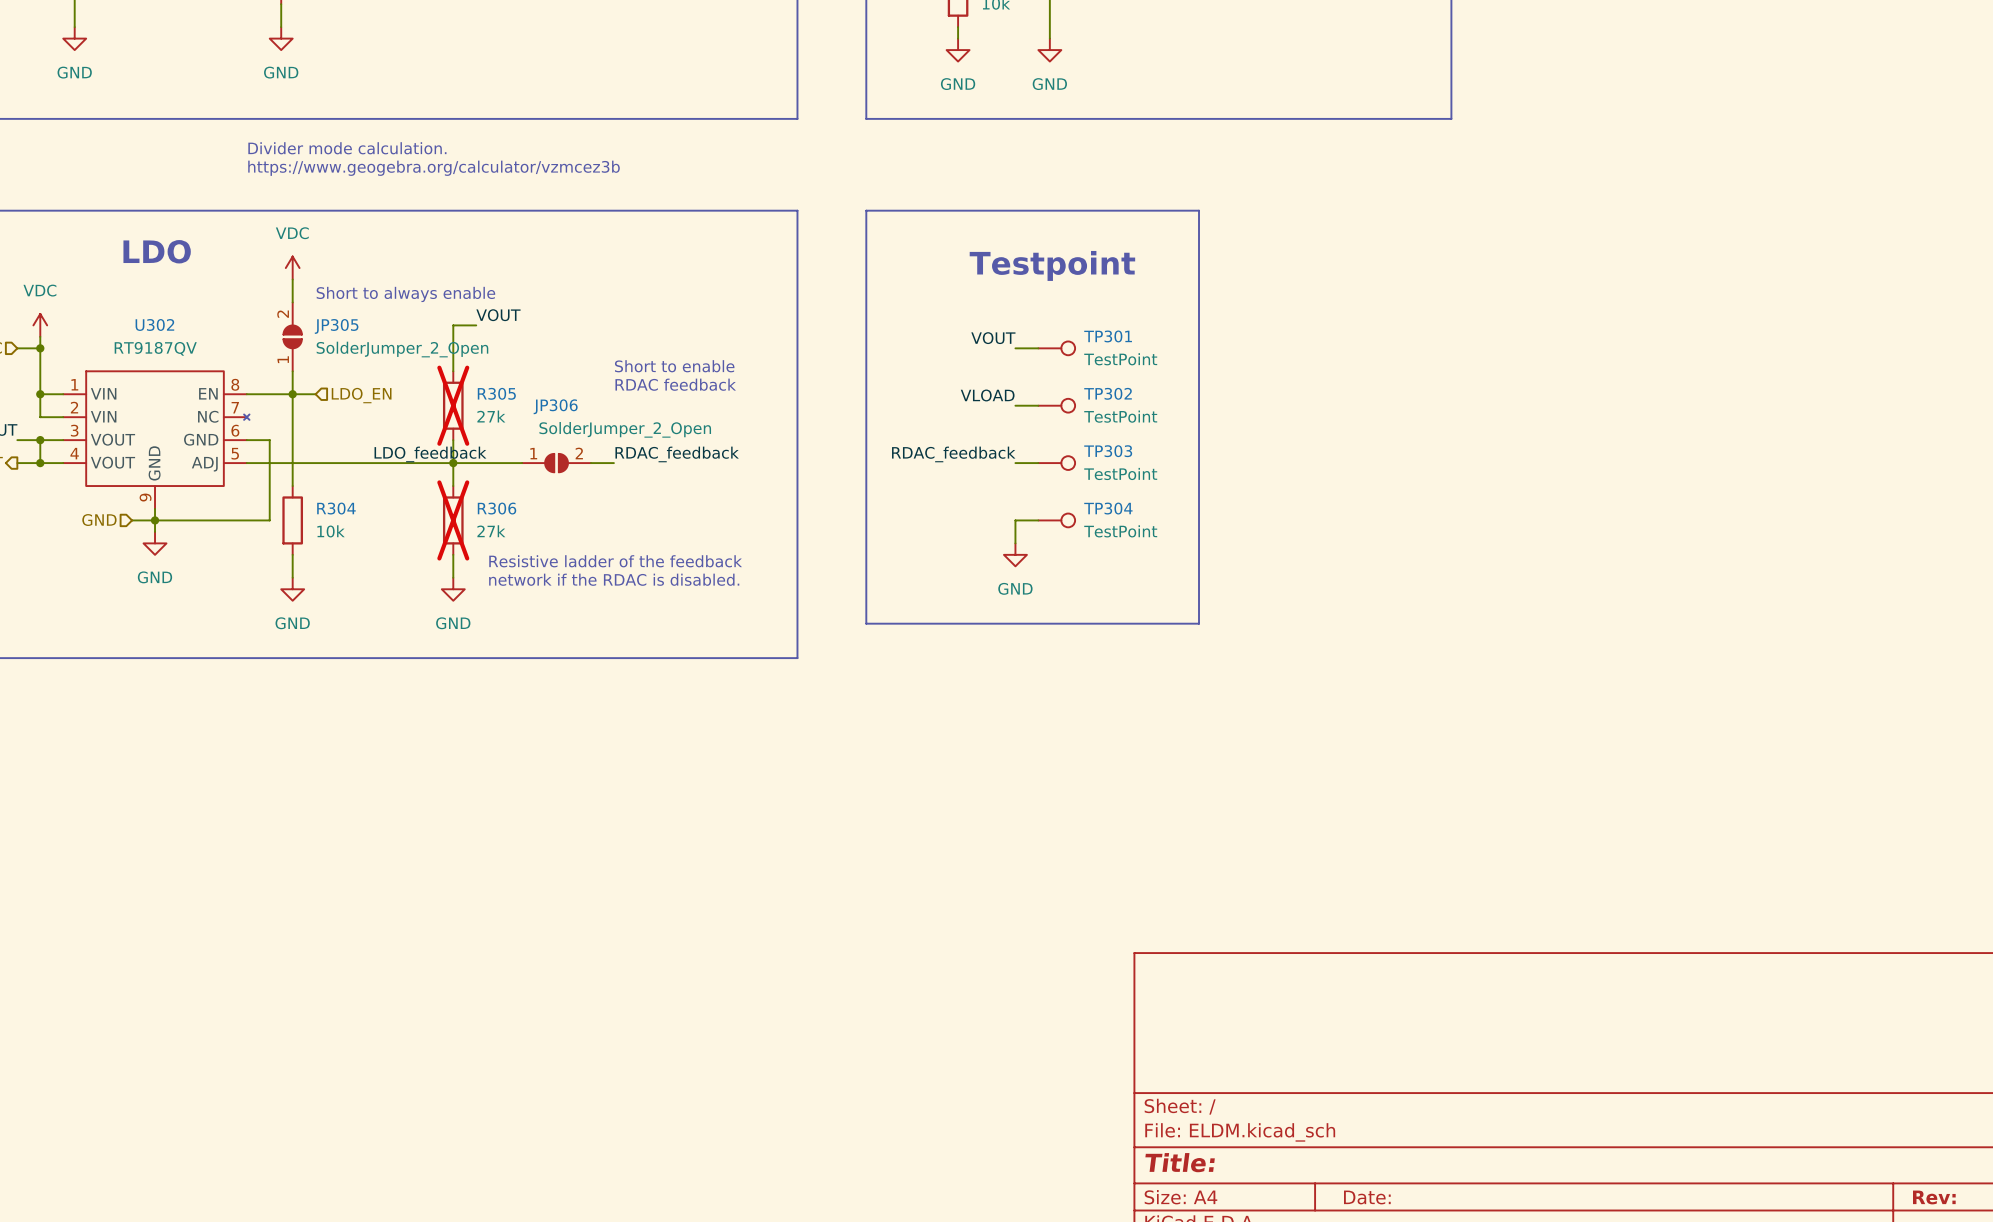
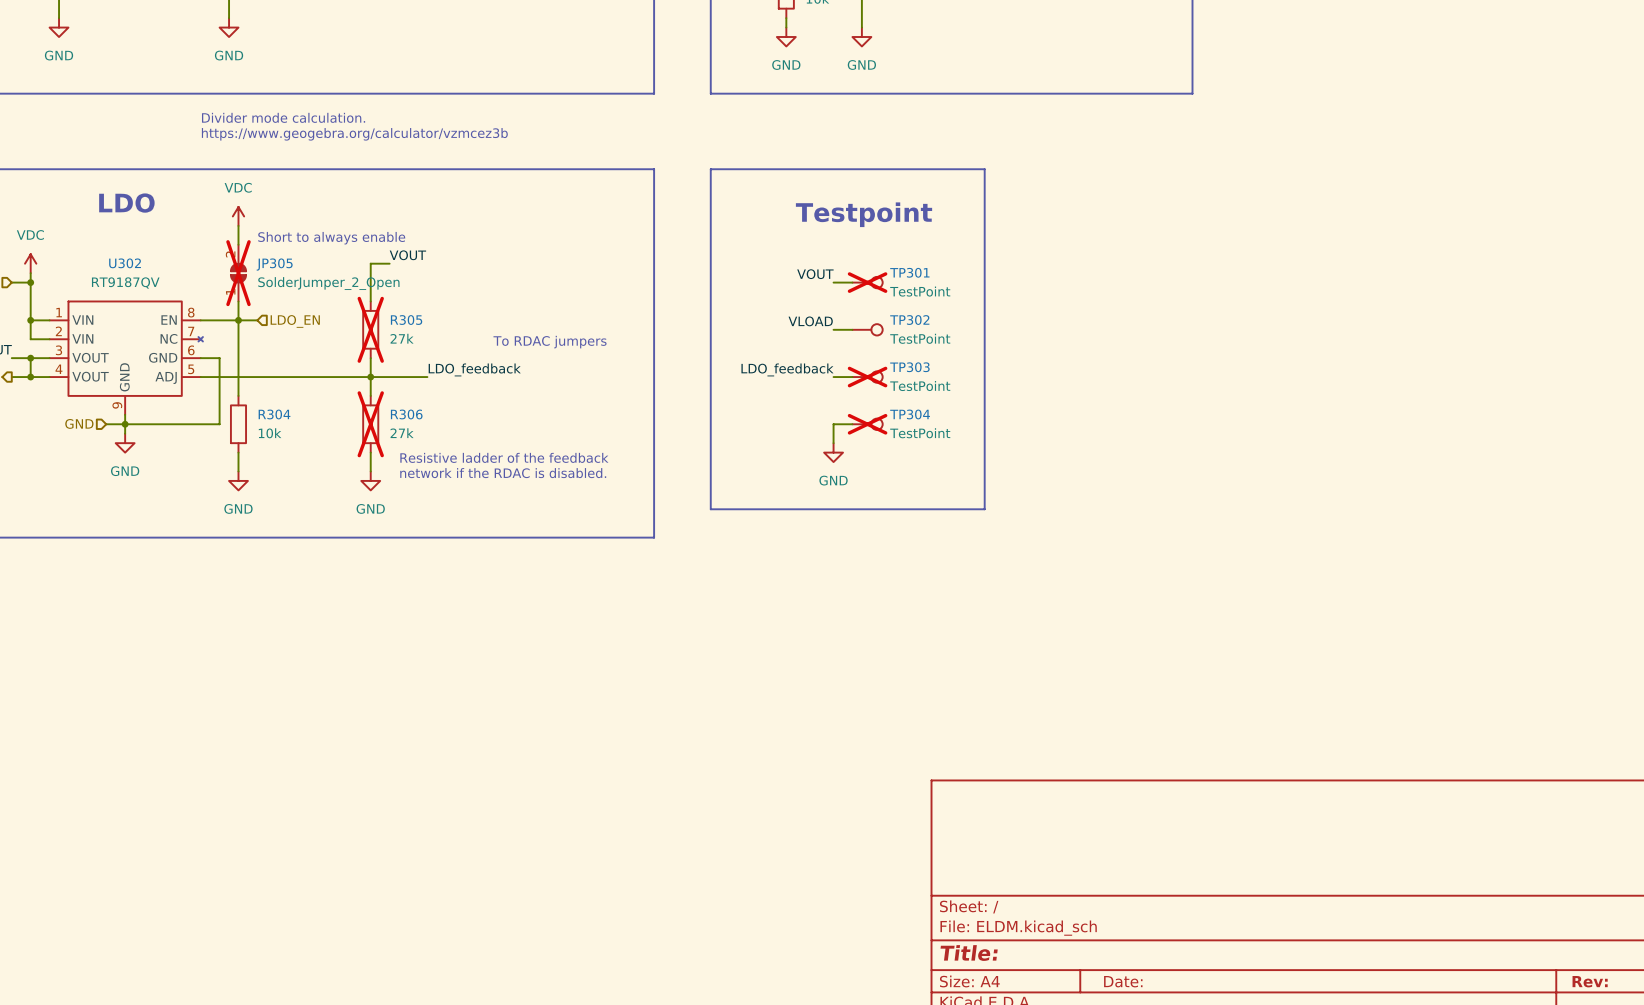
JP305 do-not-place cross: none -> (238, 273)
TP301 do-not-place cross: none -> (867, 282)
text: Short to enable (674, 366) -> none
text: RDAC feedback (675, 384) -> none
text: none -> To RDAC jumpers (550, 342)
label position: LDO_feedback (430, 454) -> LDO_feedback (474, 369)
label: RDAC_feedback (677, 454) -> none
label: RDAC_feedback (953, 454) -> LDO_feedback (787, 369)
JP306: SolderJumper_2_Open (556, 463) -> none
wire: (590, 463) (613, 463) -> none
TP303 do-not-place cross: none -> (867, 377)
TP304 do-not-place cross: none -> (867, 424)

